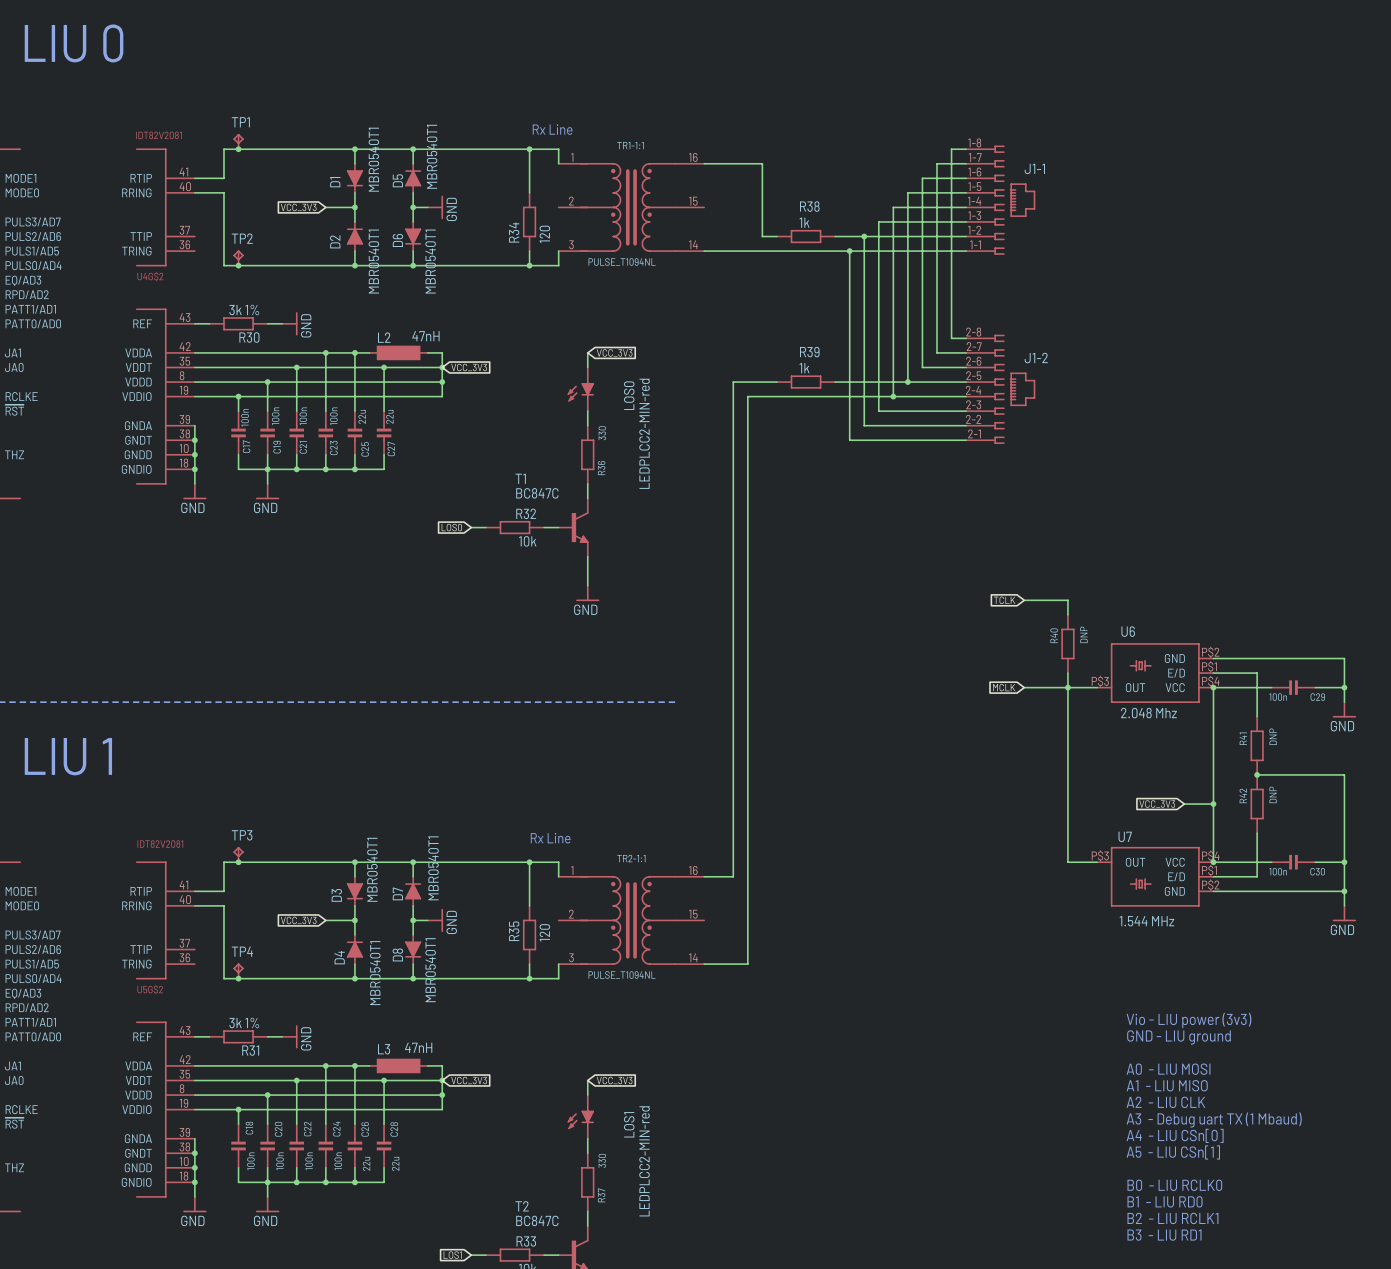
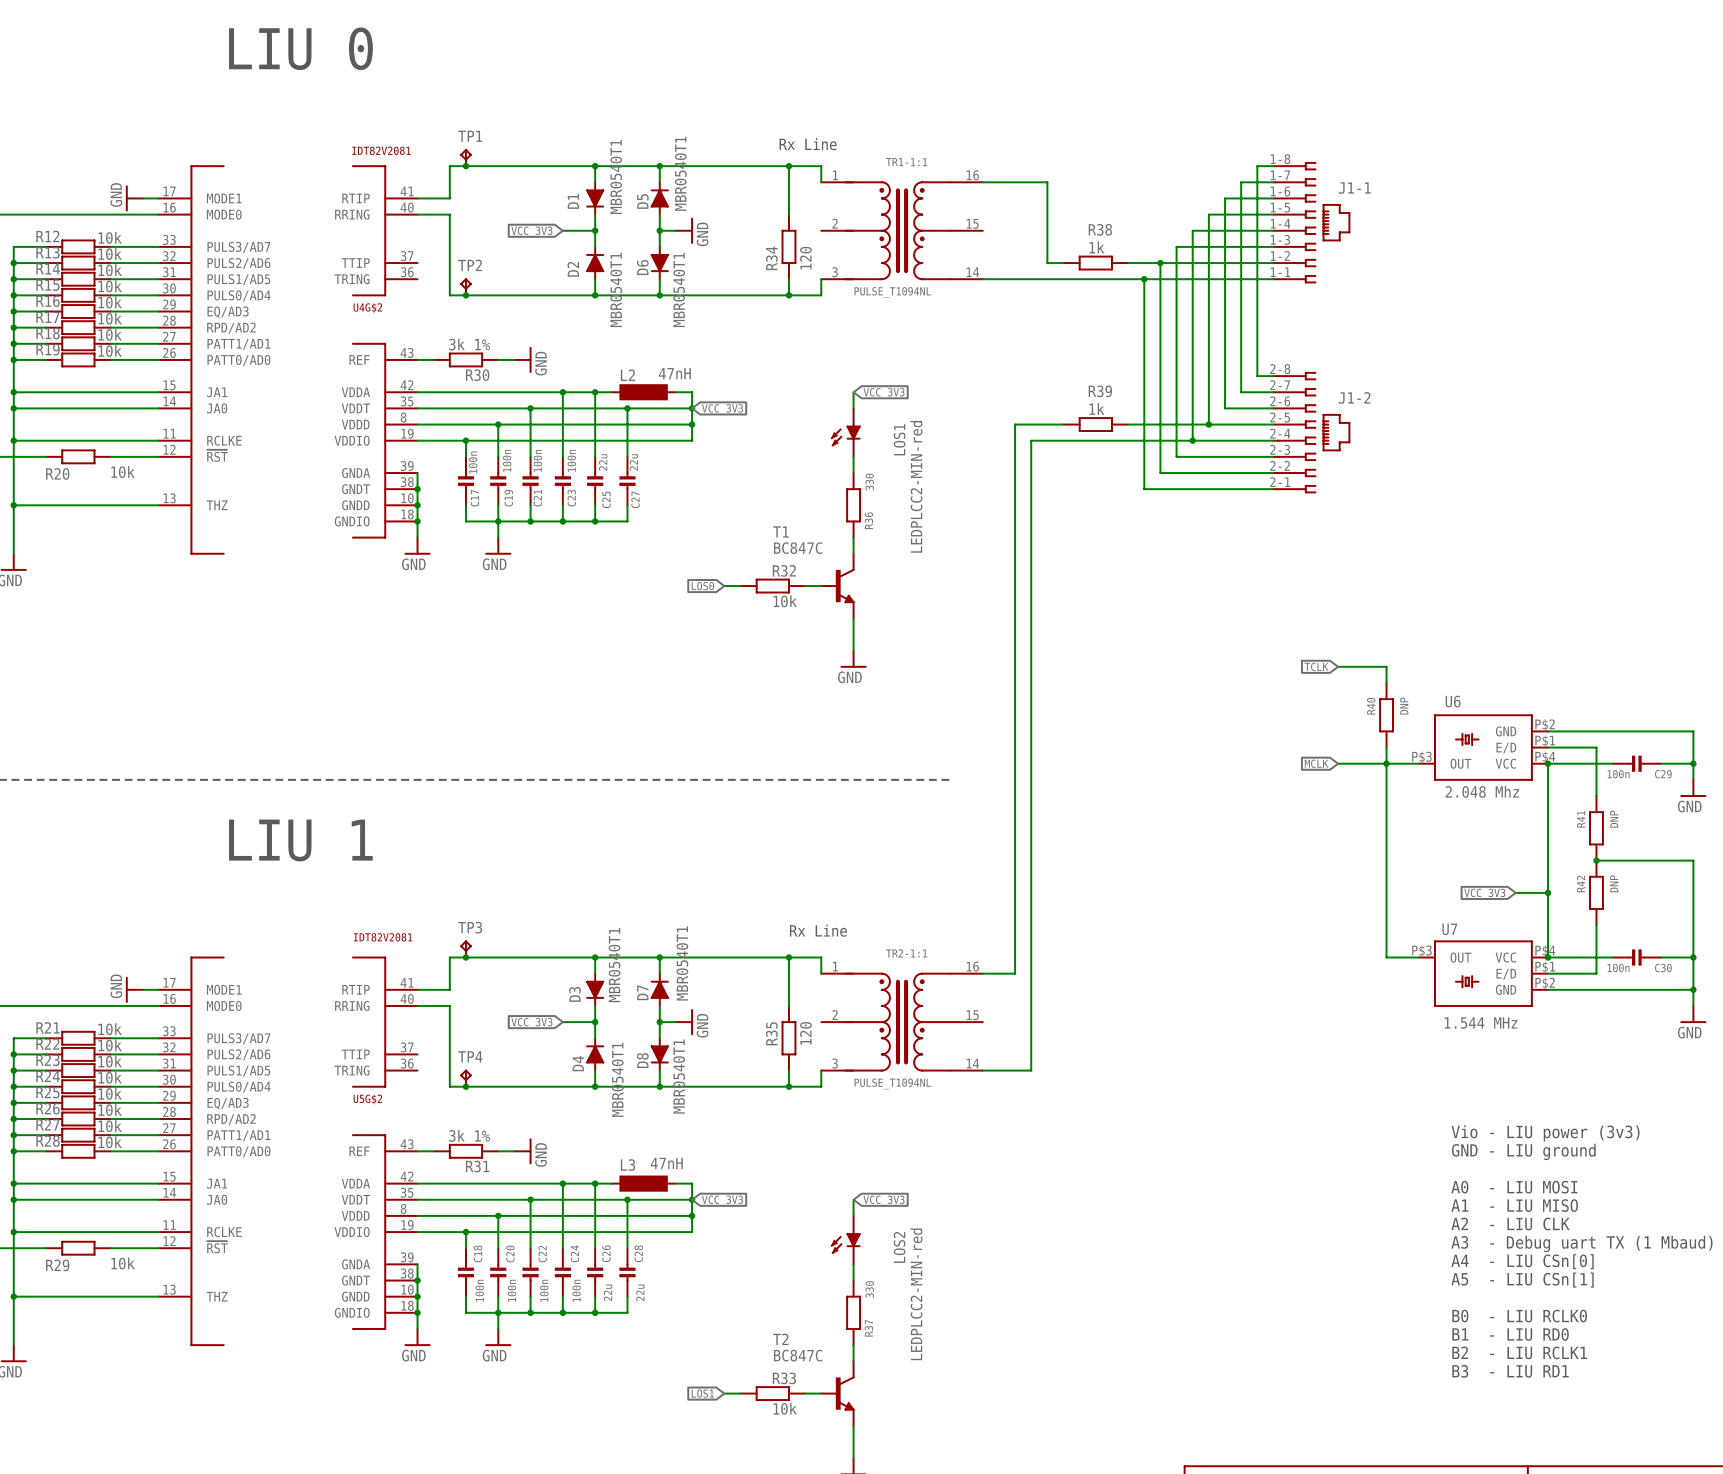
LOS0 name: LOS0 (629, 395) -> LOS1 (899, 439)
LOS1 name: LOS1 (629, 1124) -> LOS2 (899, 1247)

